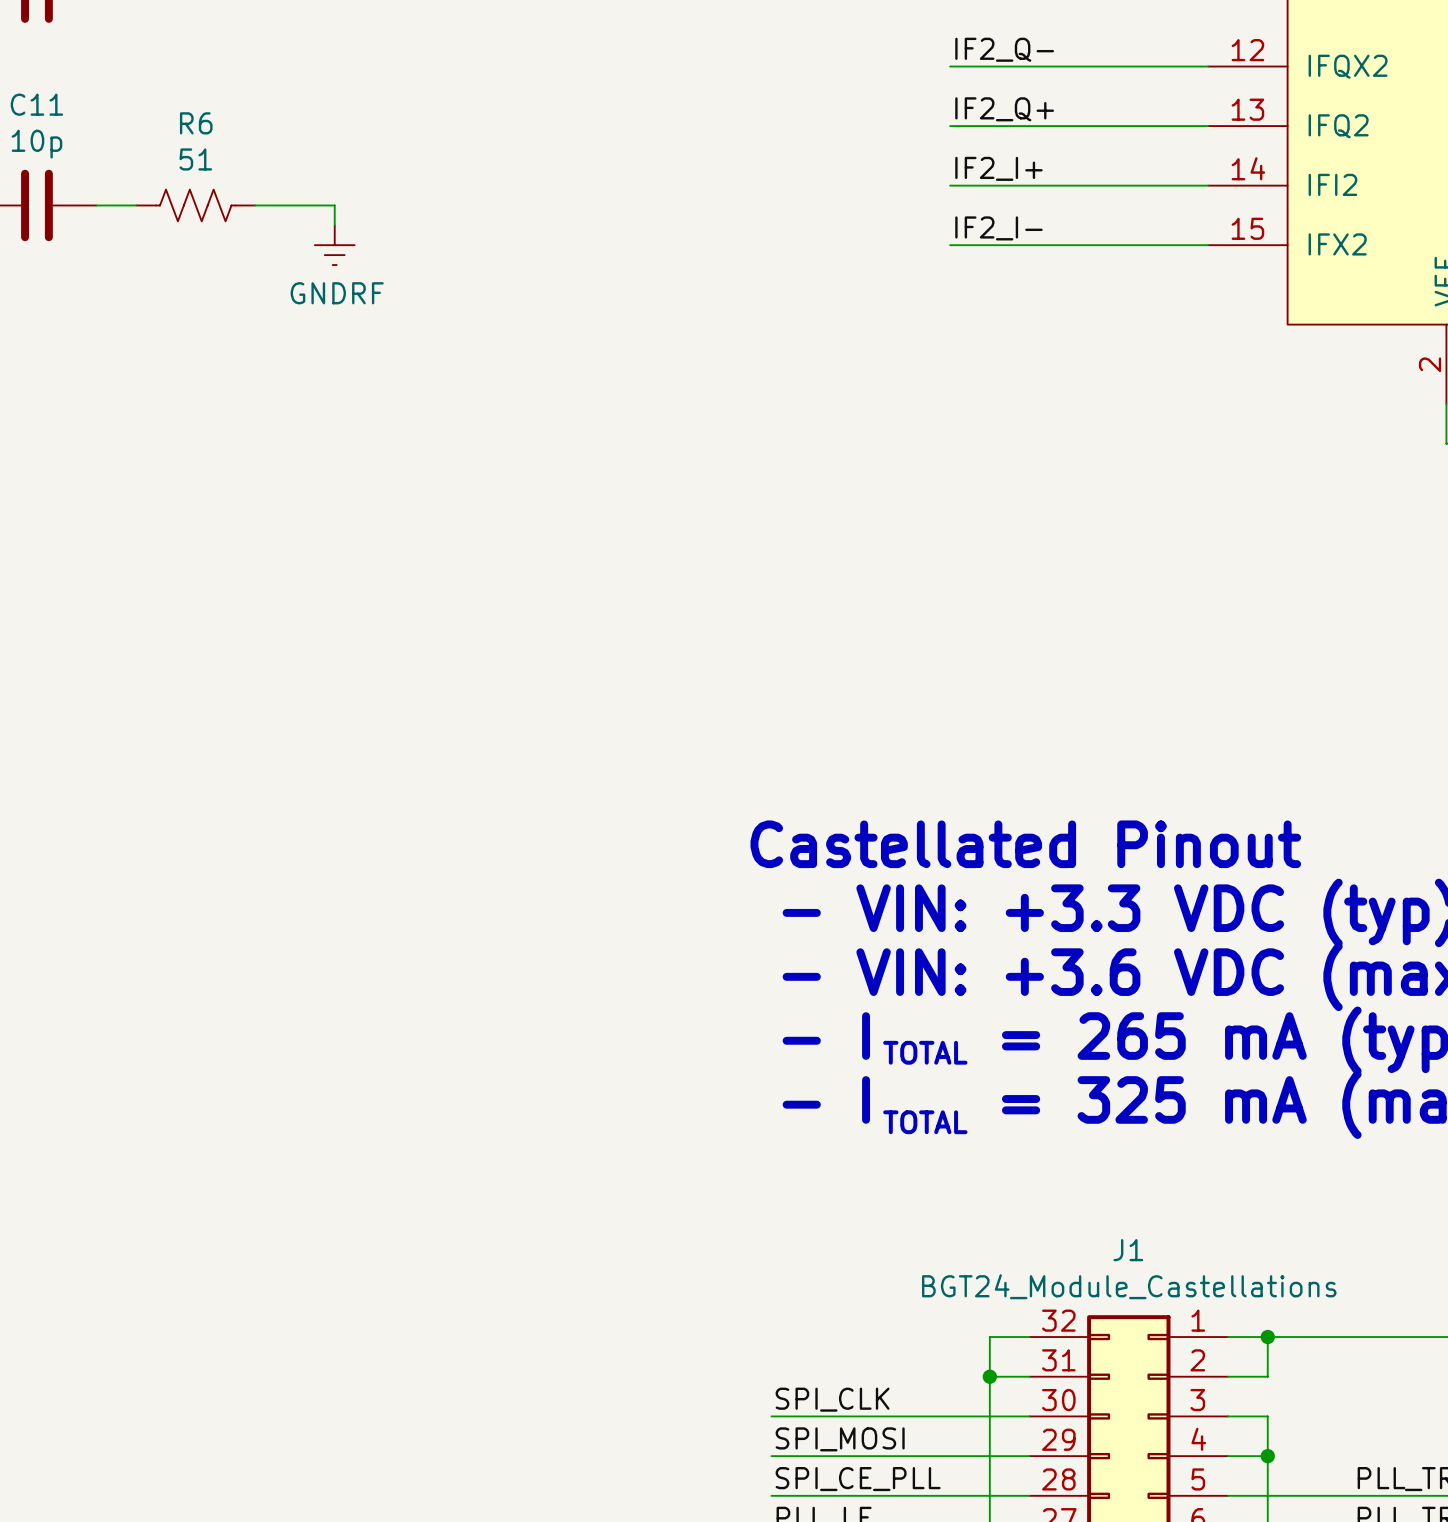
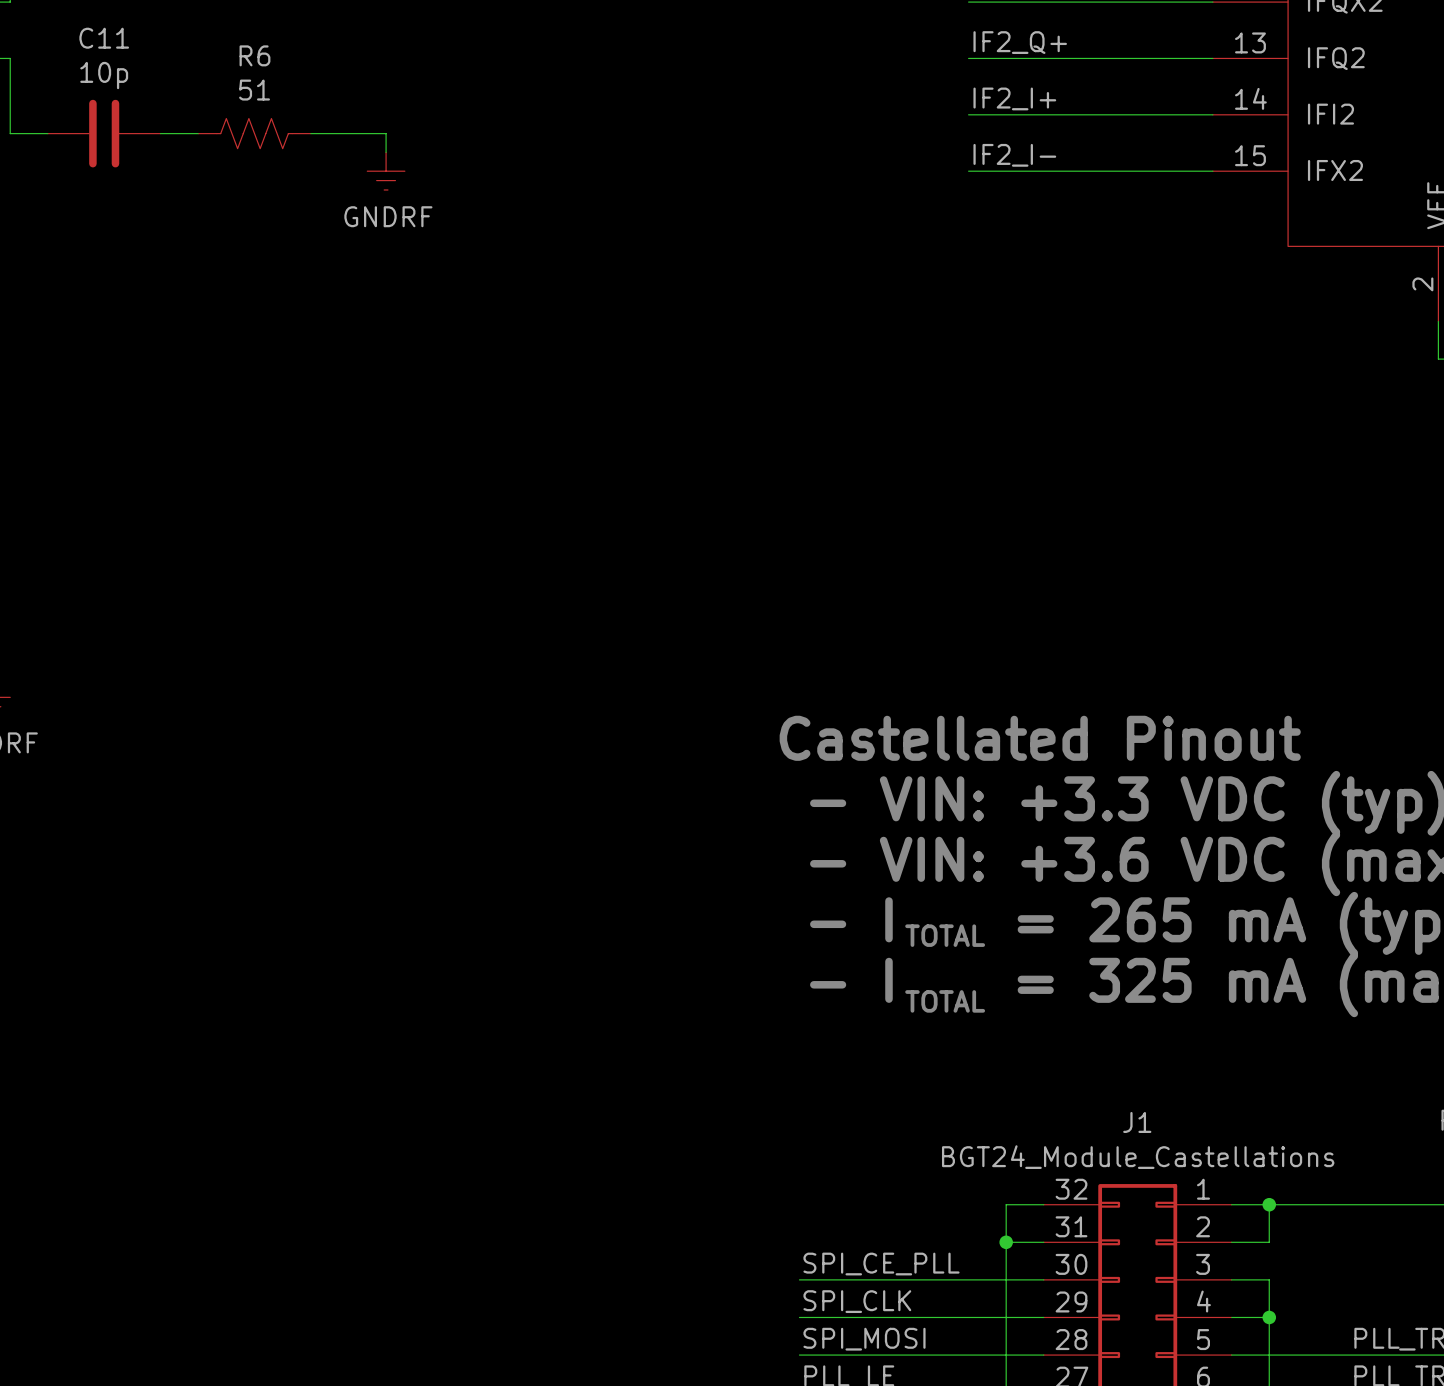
label: SPI_CLK (832, 1399) -> SPI_CE_PLL (881, 1264)
label: SPI_MOSI (840, 1439) -> SPI_CLK (857, 1301)
label: SPI_CE_PLL (858, 1479) -> SPI_MOSI (864, 1339)

